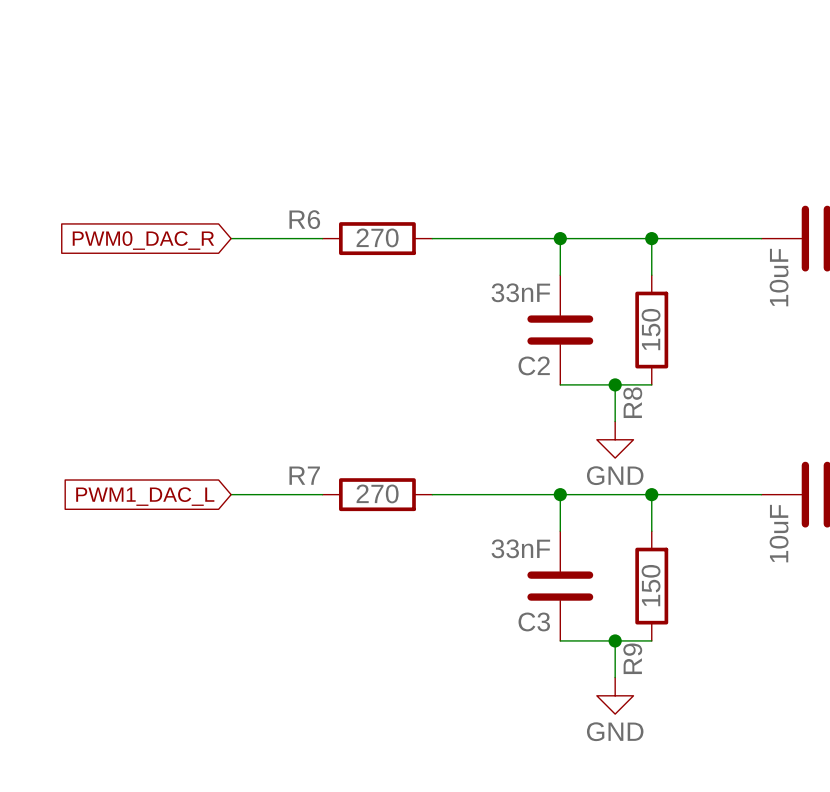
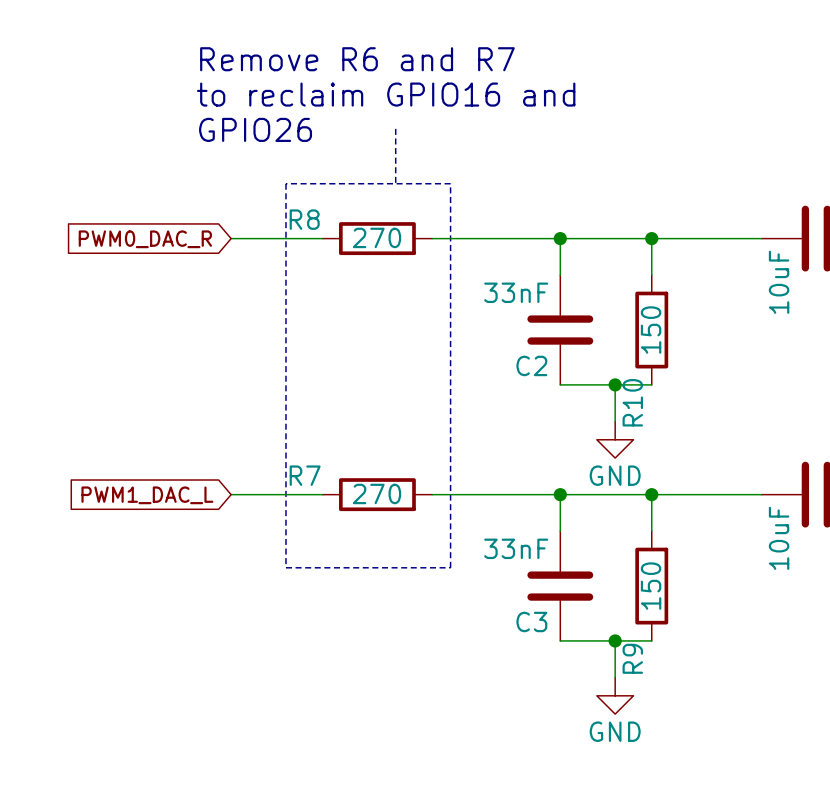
text: none -> Remove R6 and R7 (357, 59)
text: none -> to reclaim GPIO16 and (386, 94)
line: none -> (395, 128) (395, 183)
text: none -> GPIO26 (255, 129)
line: none -> (285, 183) (285, 567) (450, 567) (450, 183) (285, 183)
R6 name: R6 (304, 219) -> R8 (304, 219)
R8 name: R8 (632, 402) -> R10 (632, 402)

